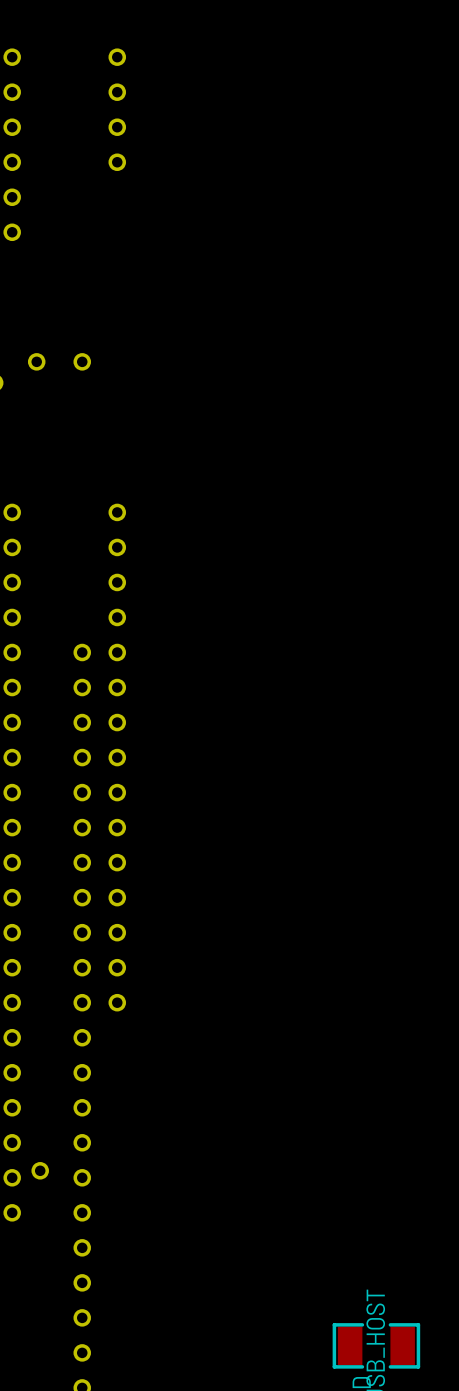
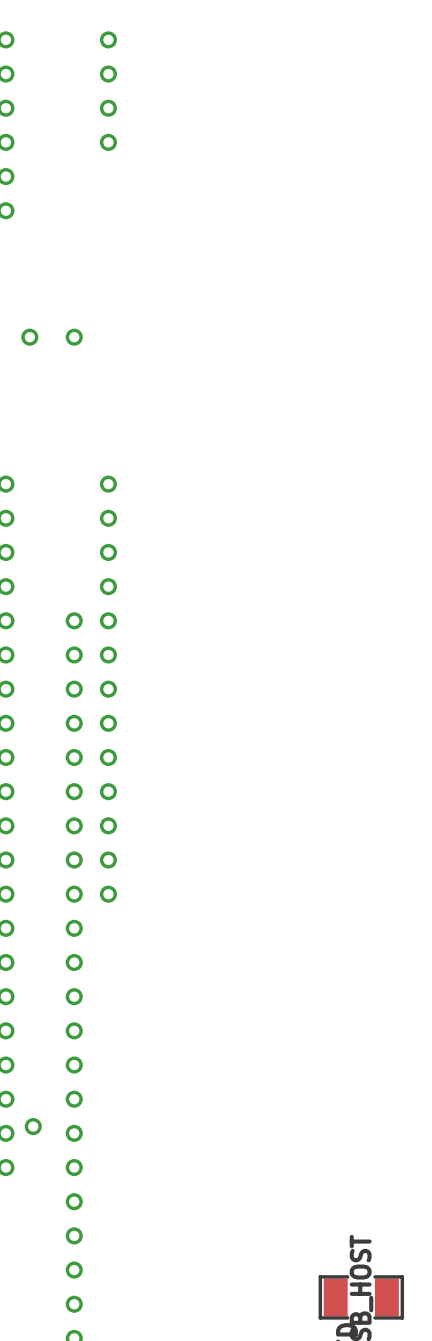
part: (117, 967) -> none
part: (117, 1002) -> none

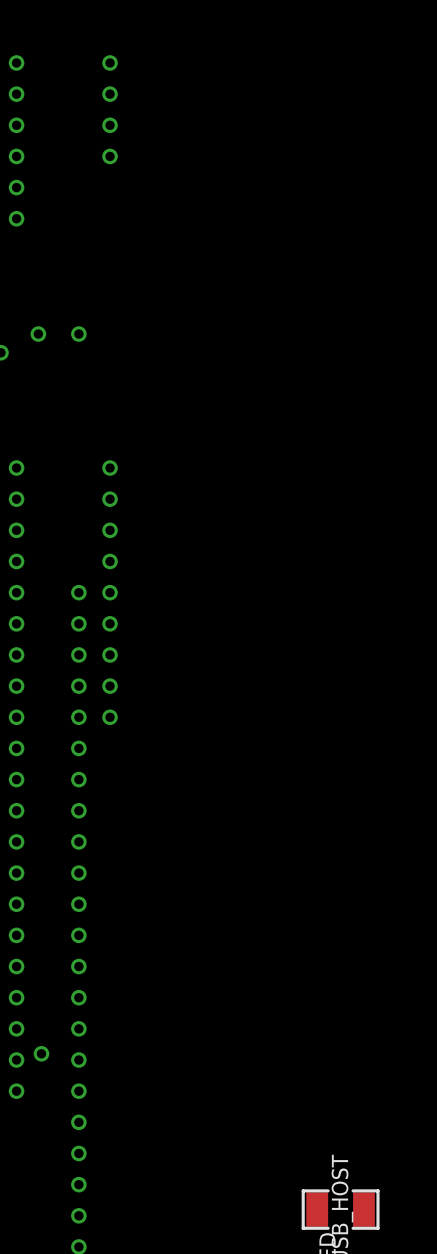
part: (108, 791) -> none
part: (108, 825) -> none
part: (108, 860) -> none
part: (108, 894) -> none

